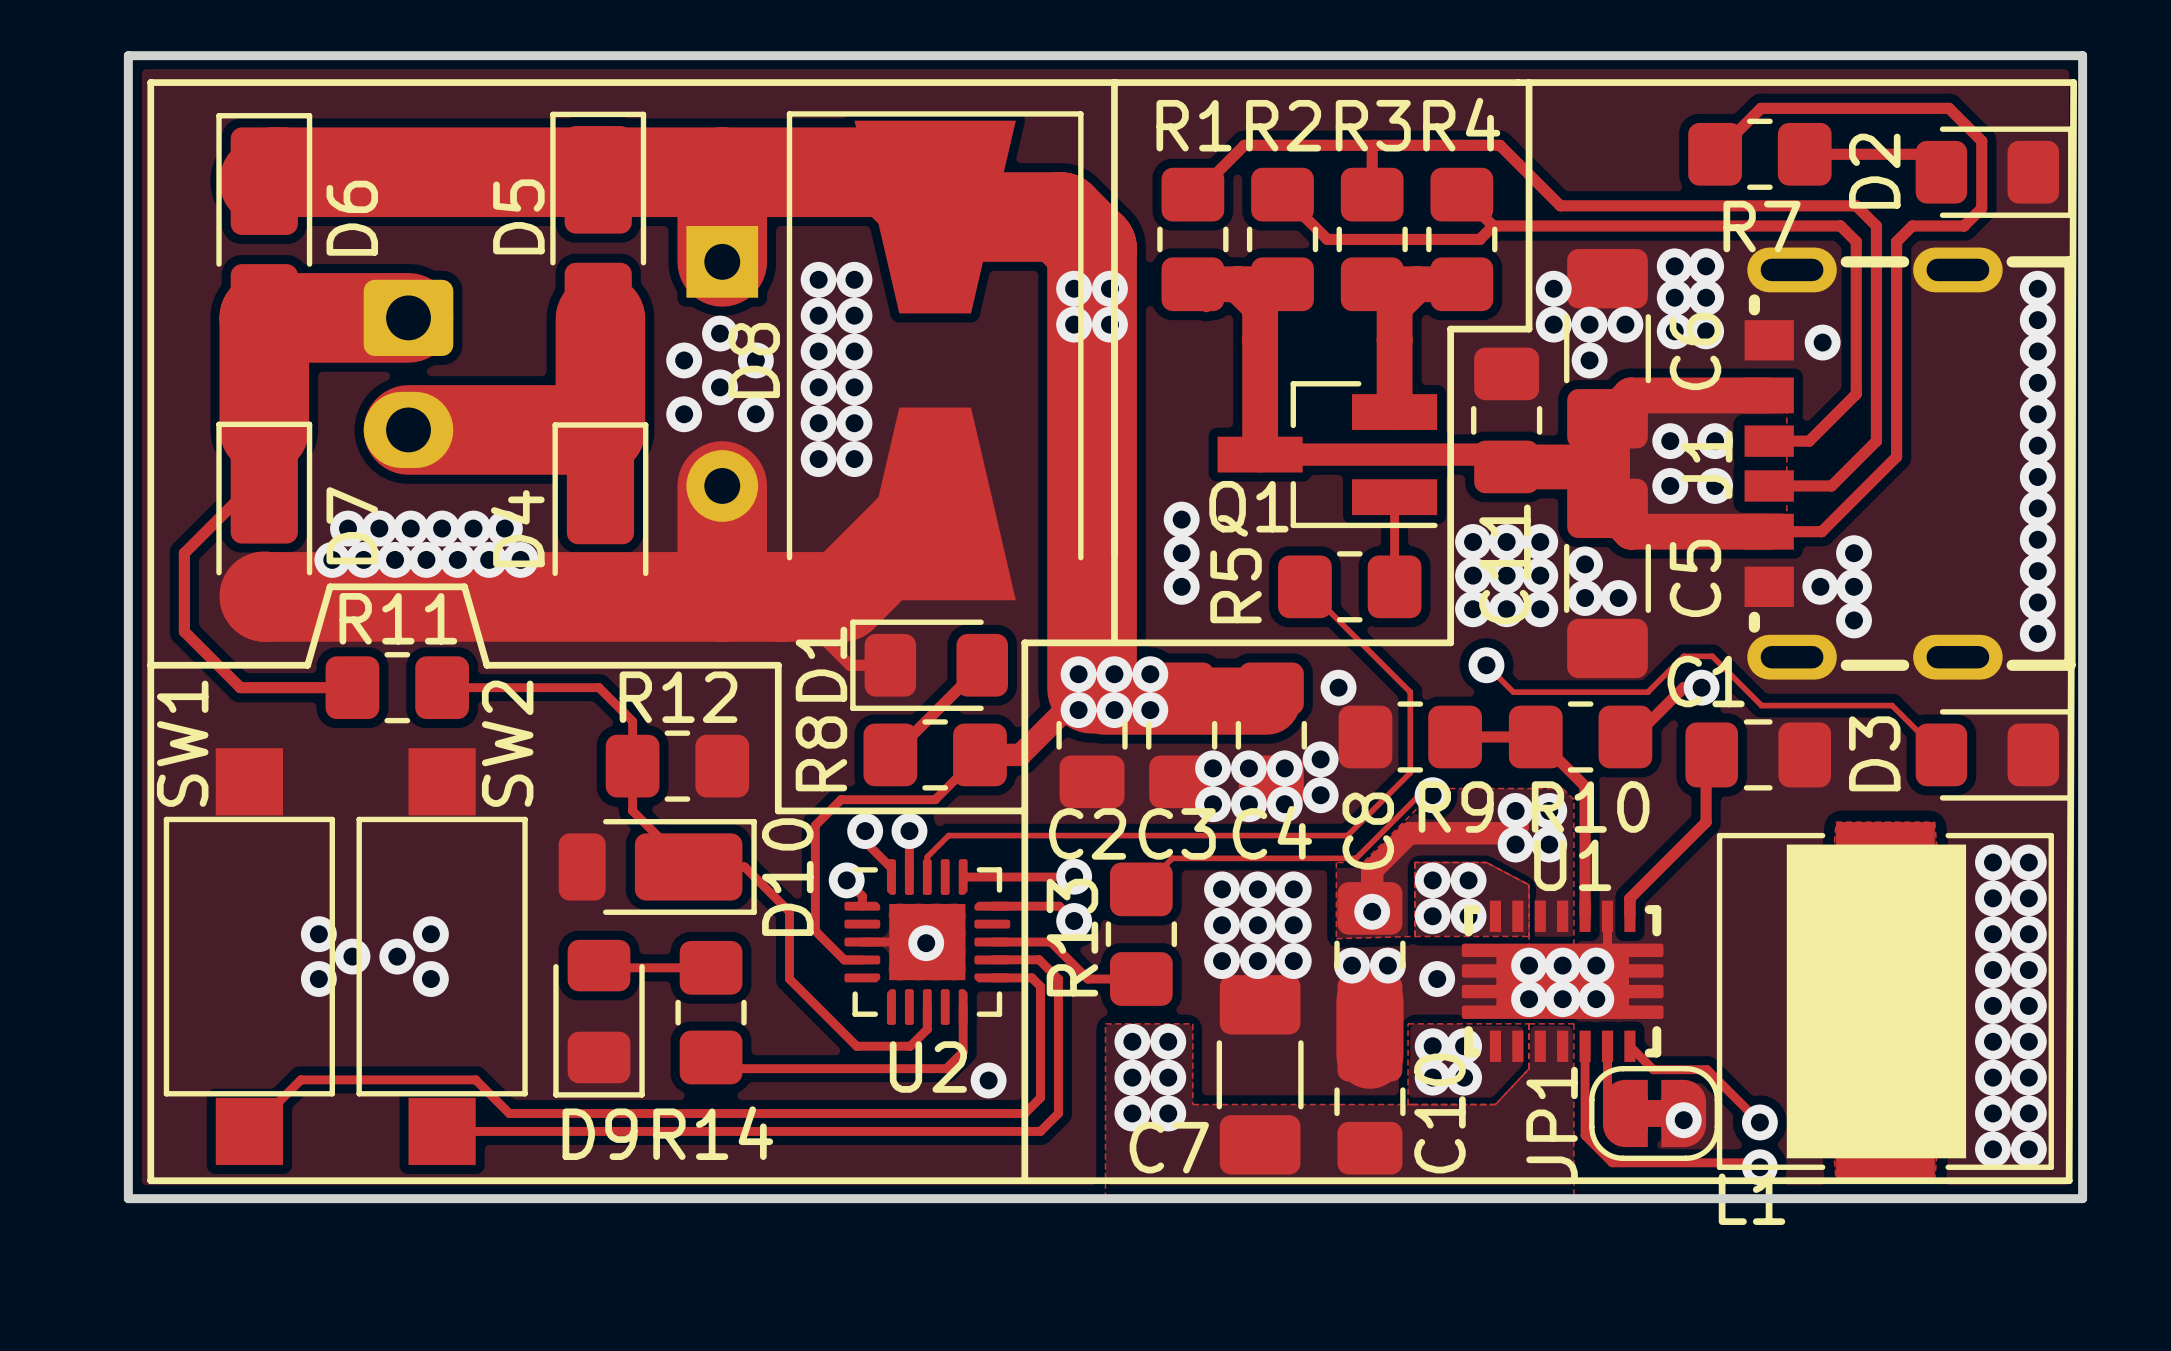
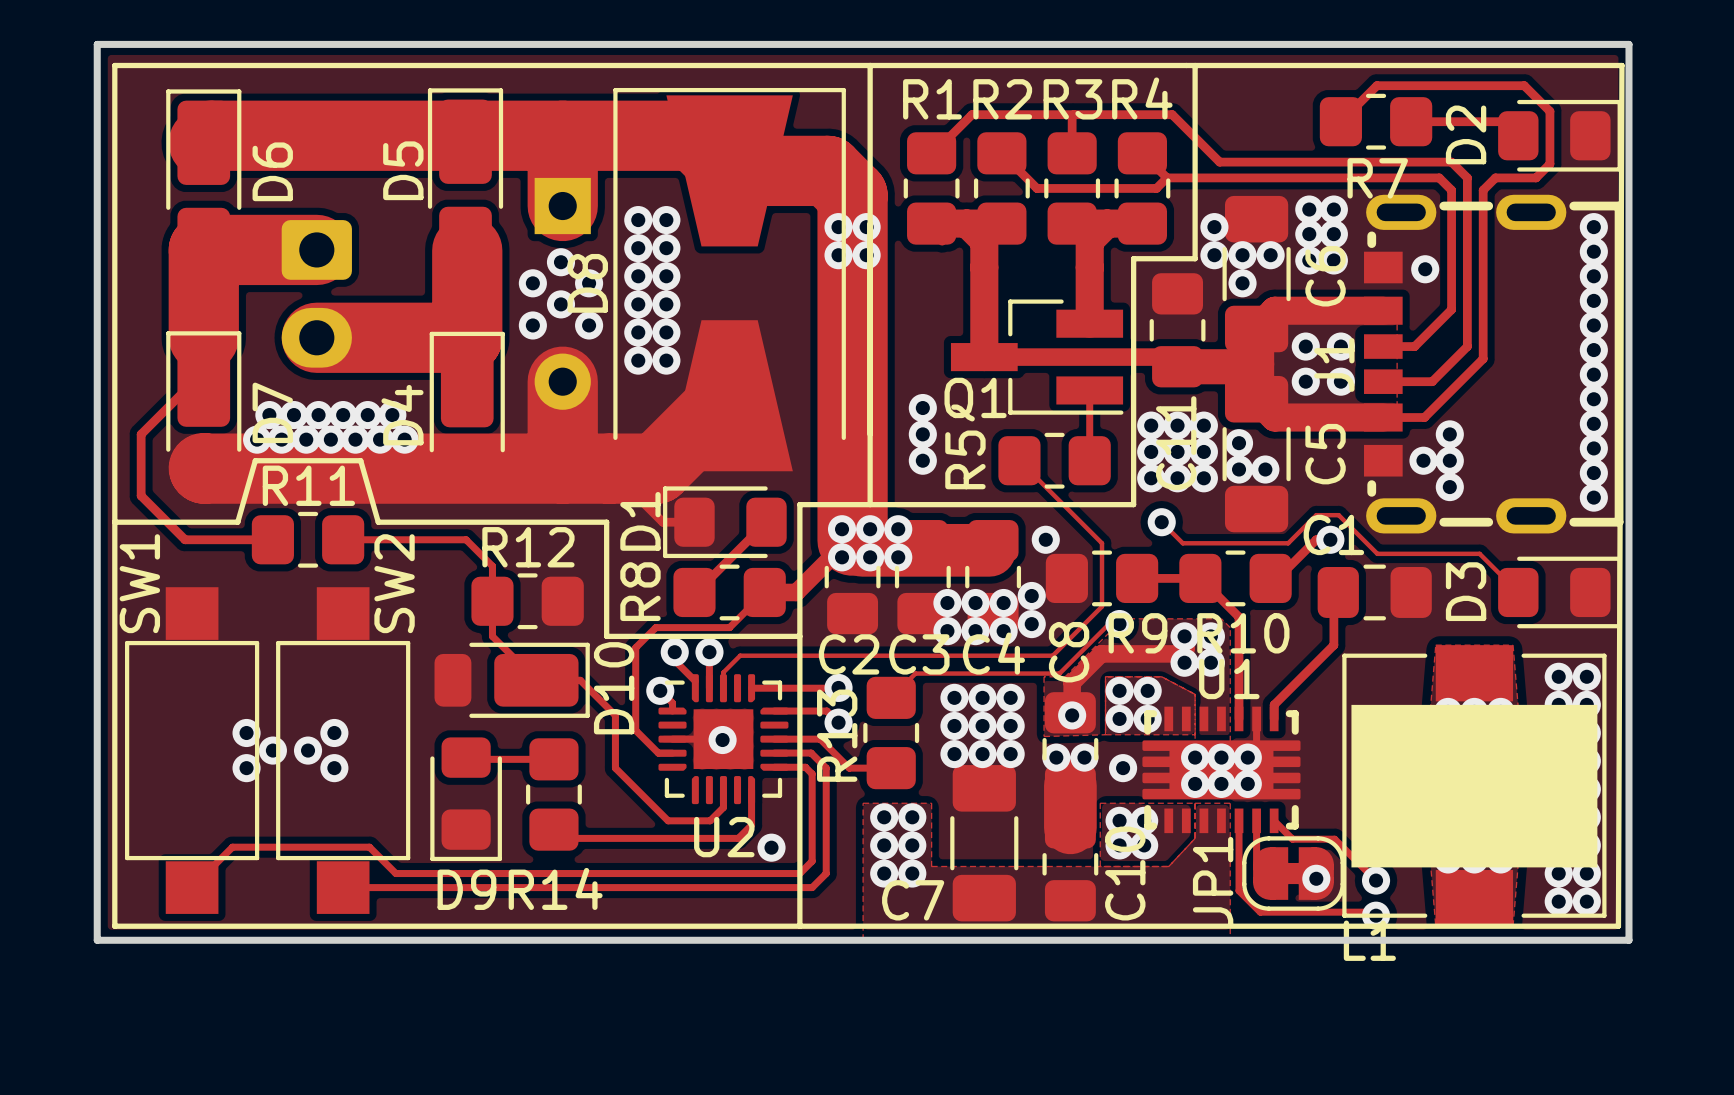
drawing shape: [1786, 844, 1967, 1159] -> [1351, 704, 1598, 868]

